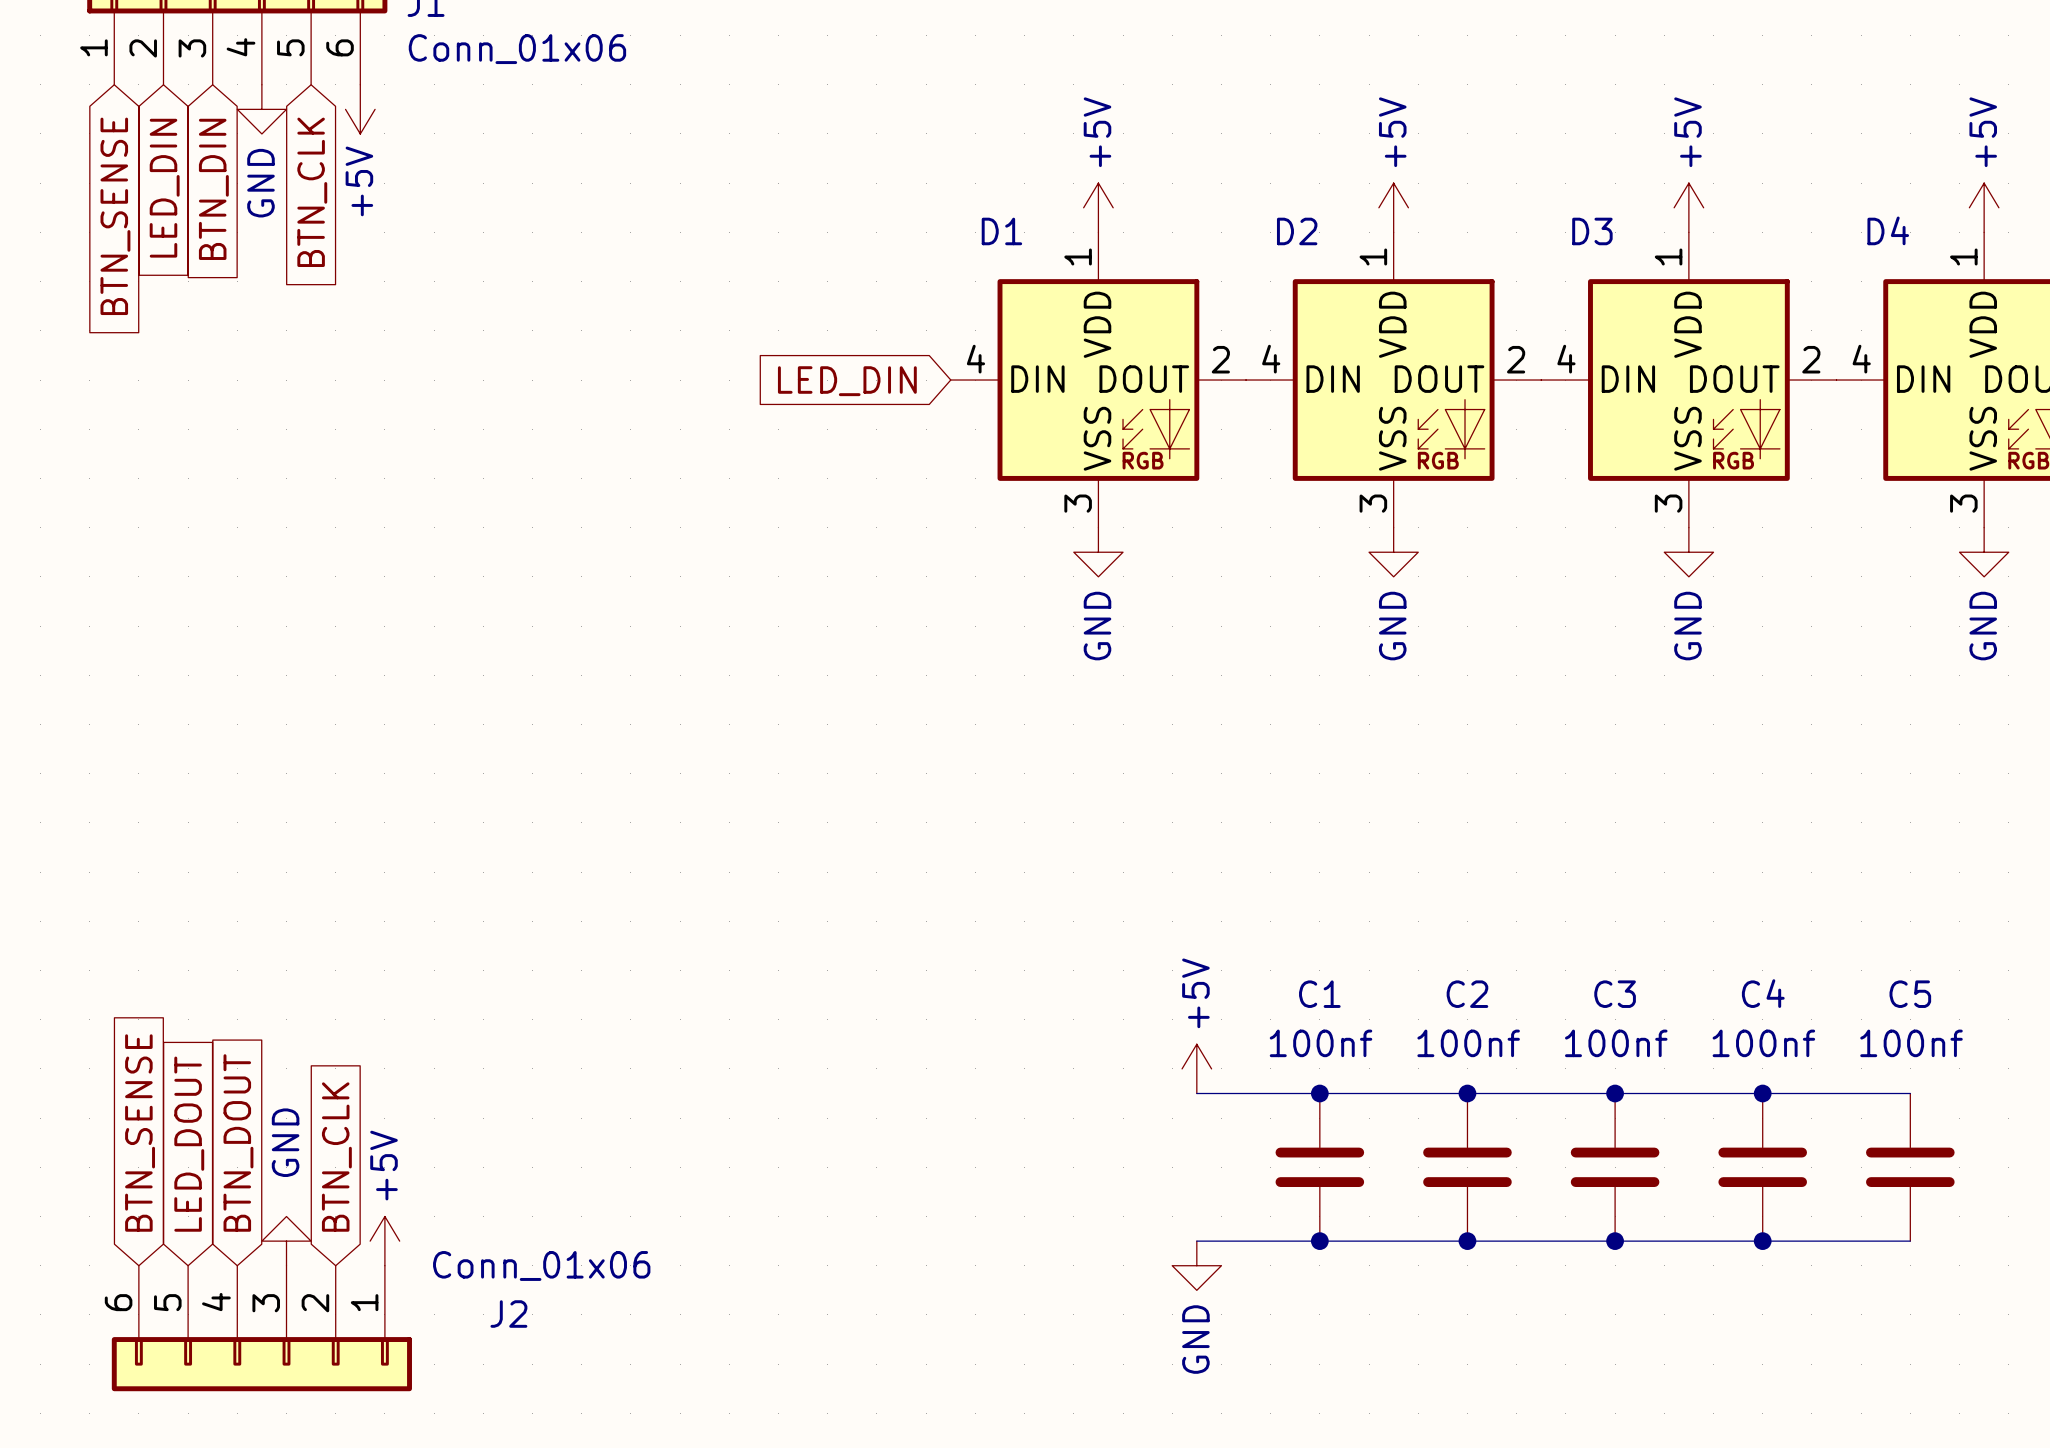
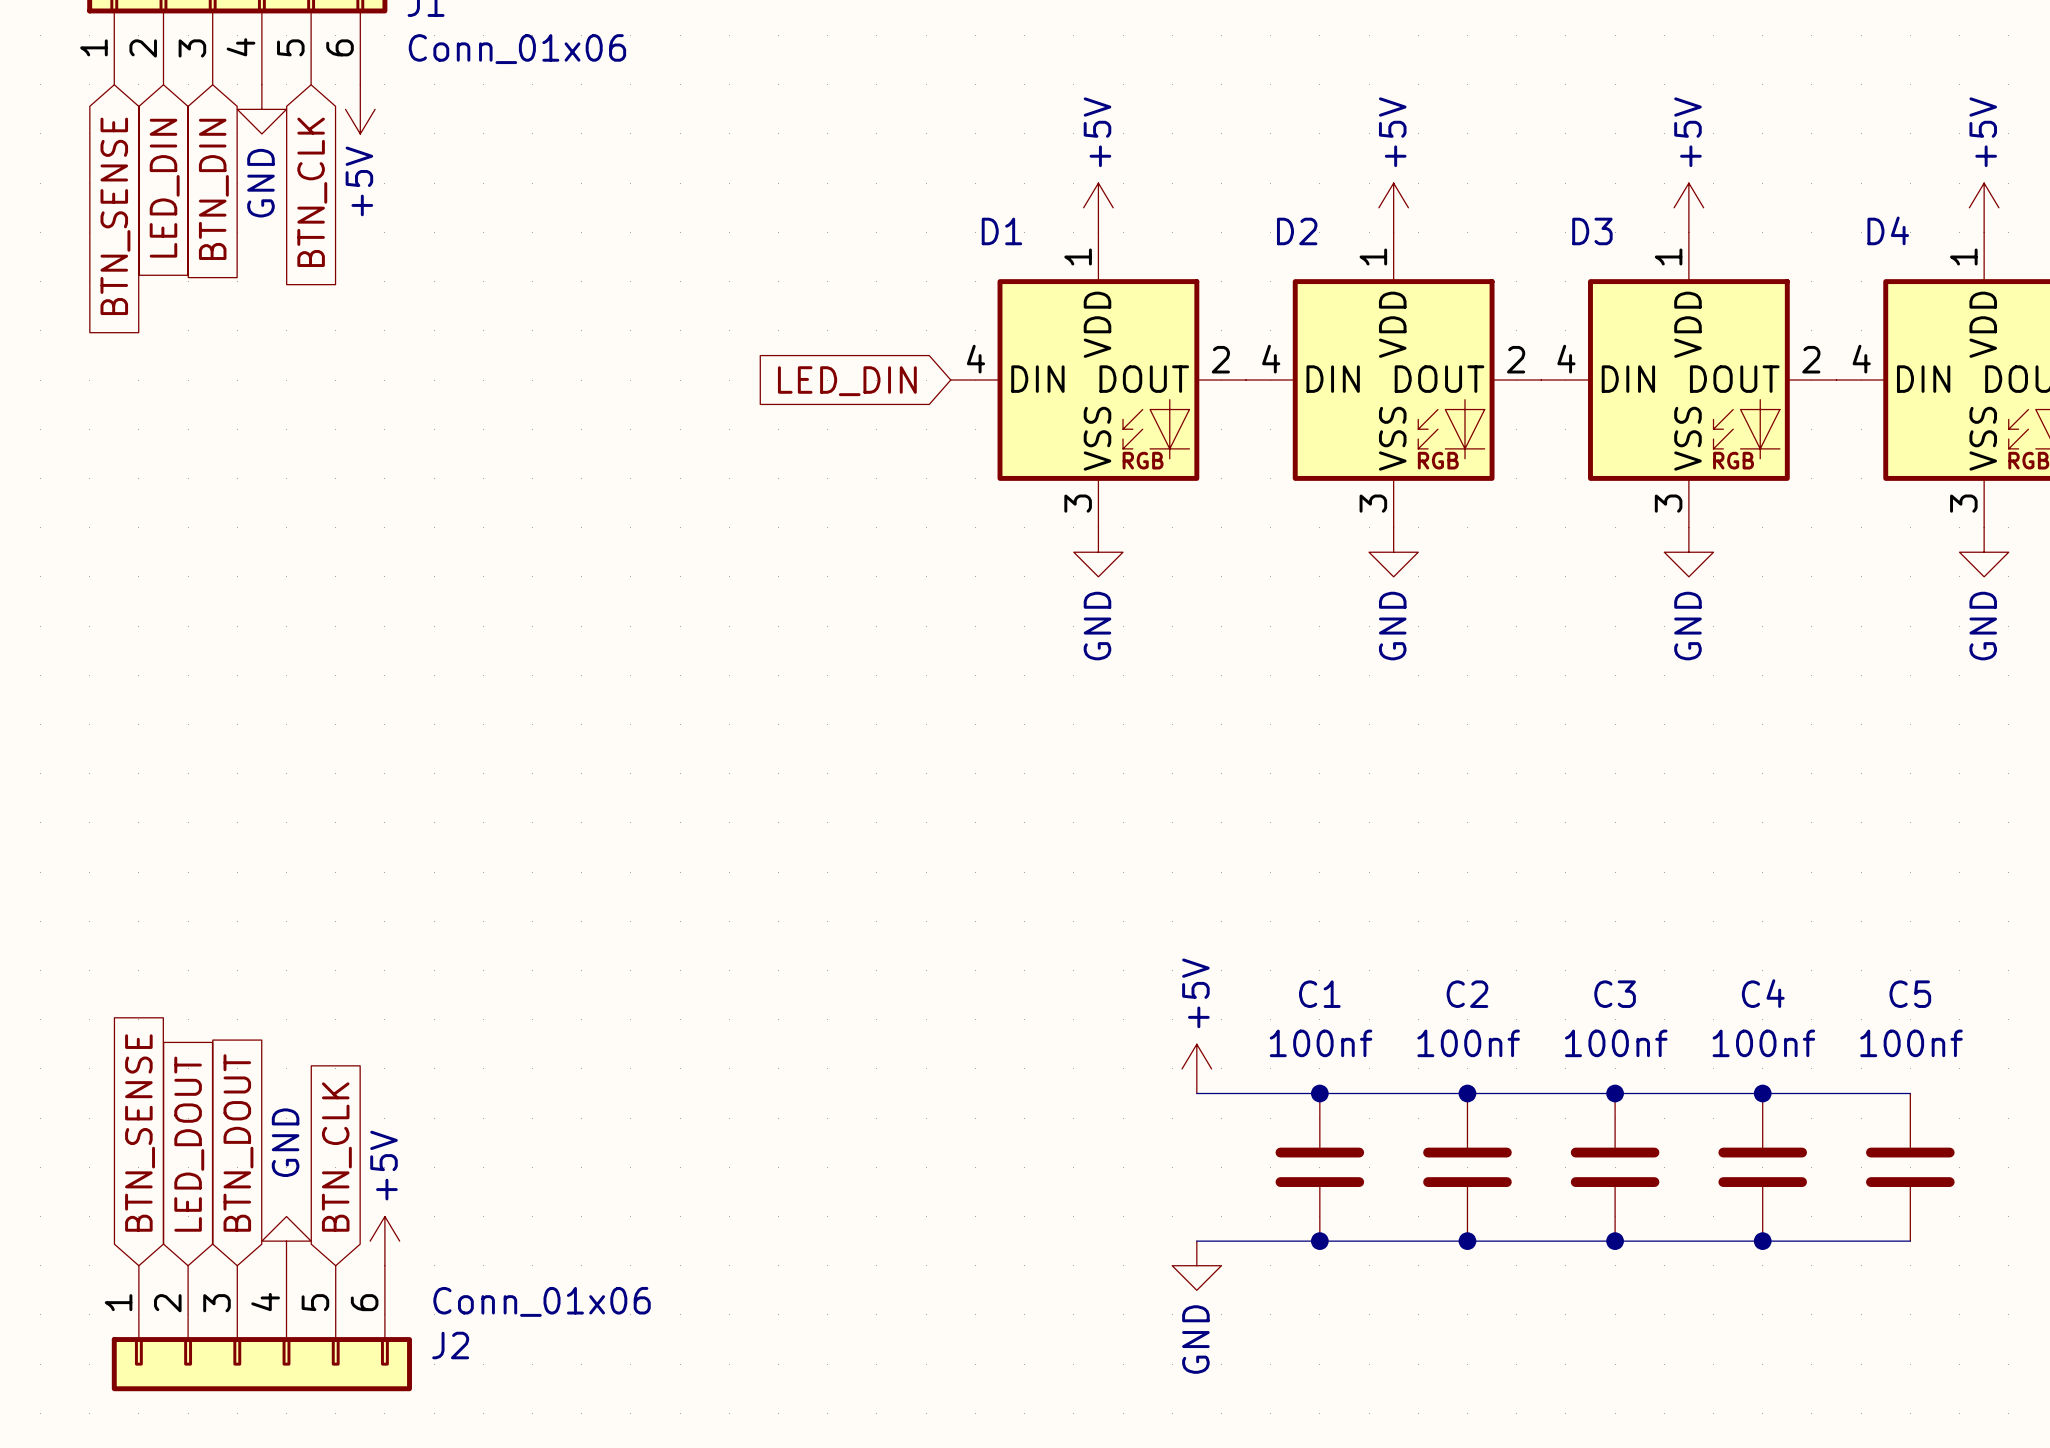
J2 value position: Conn_01x06 (541, 1265) -> Conn_01x06 (542, 1301)
J2 name position: J2 (508, 1314) -> J2 (450, 1345)
J2 flip: as is (261, 1364) -> left-right (261, 1364)

